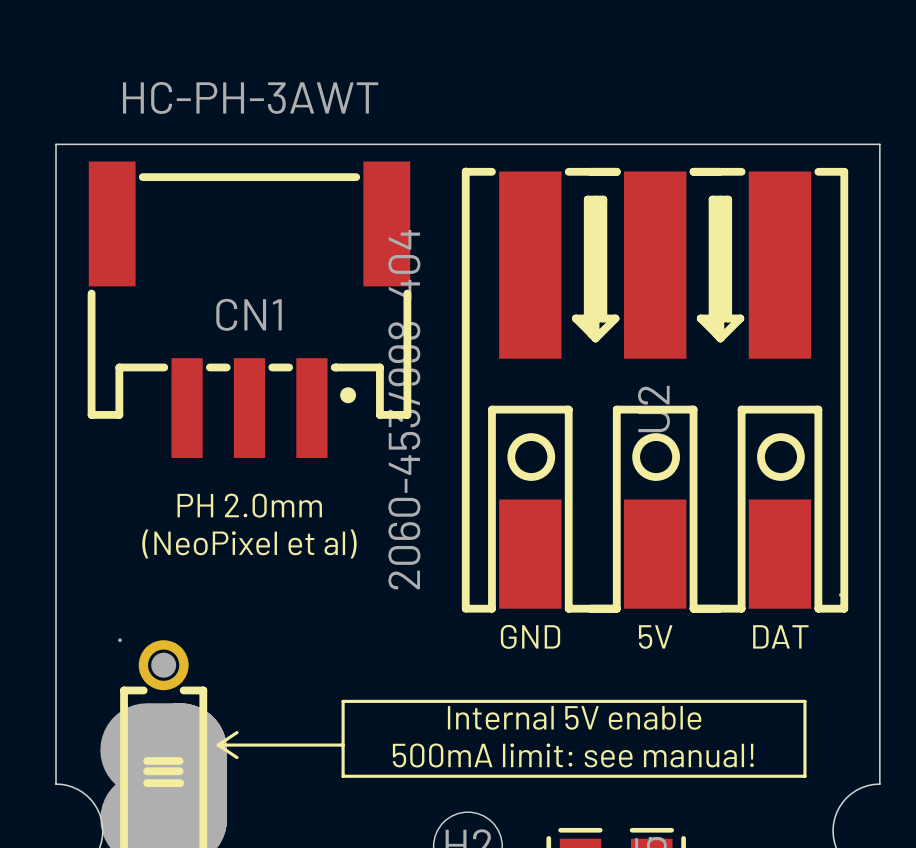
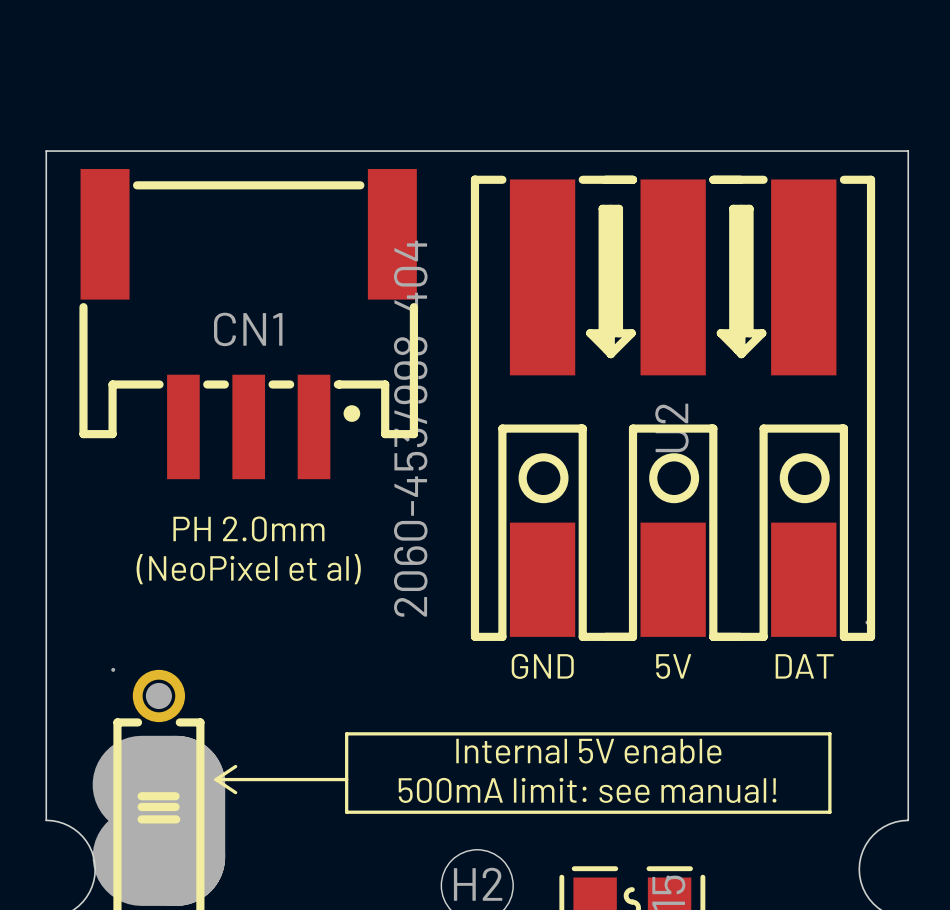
CN1 value: HC-PH-3AWT (250, 97) -> none

